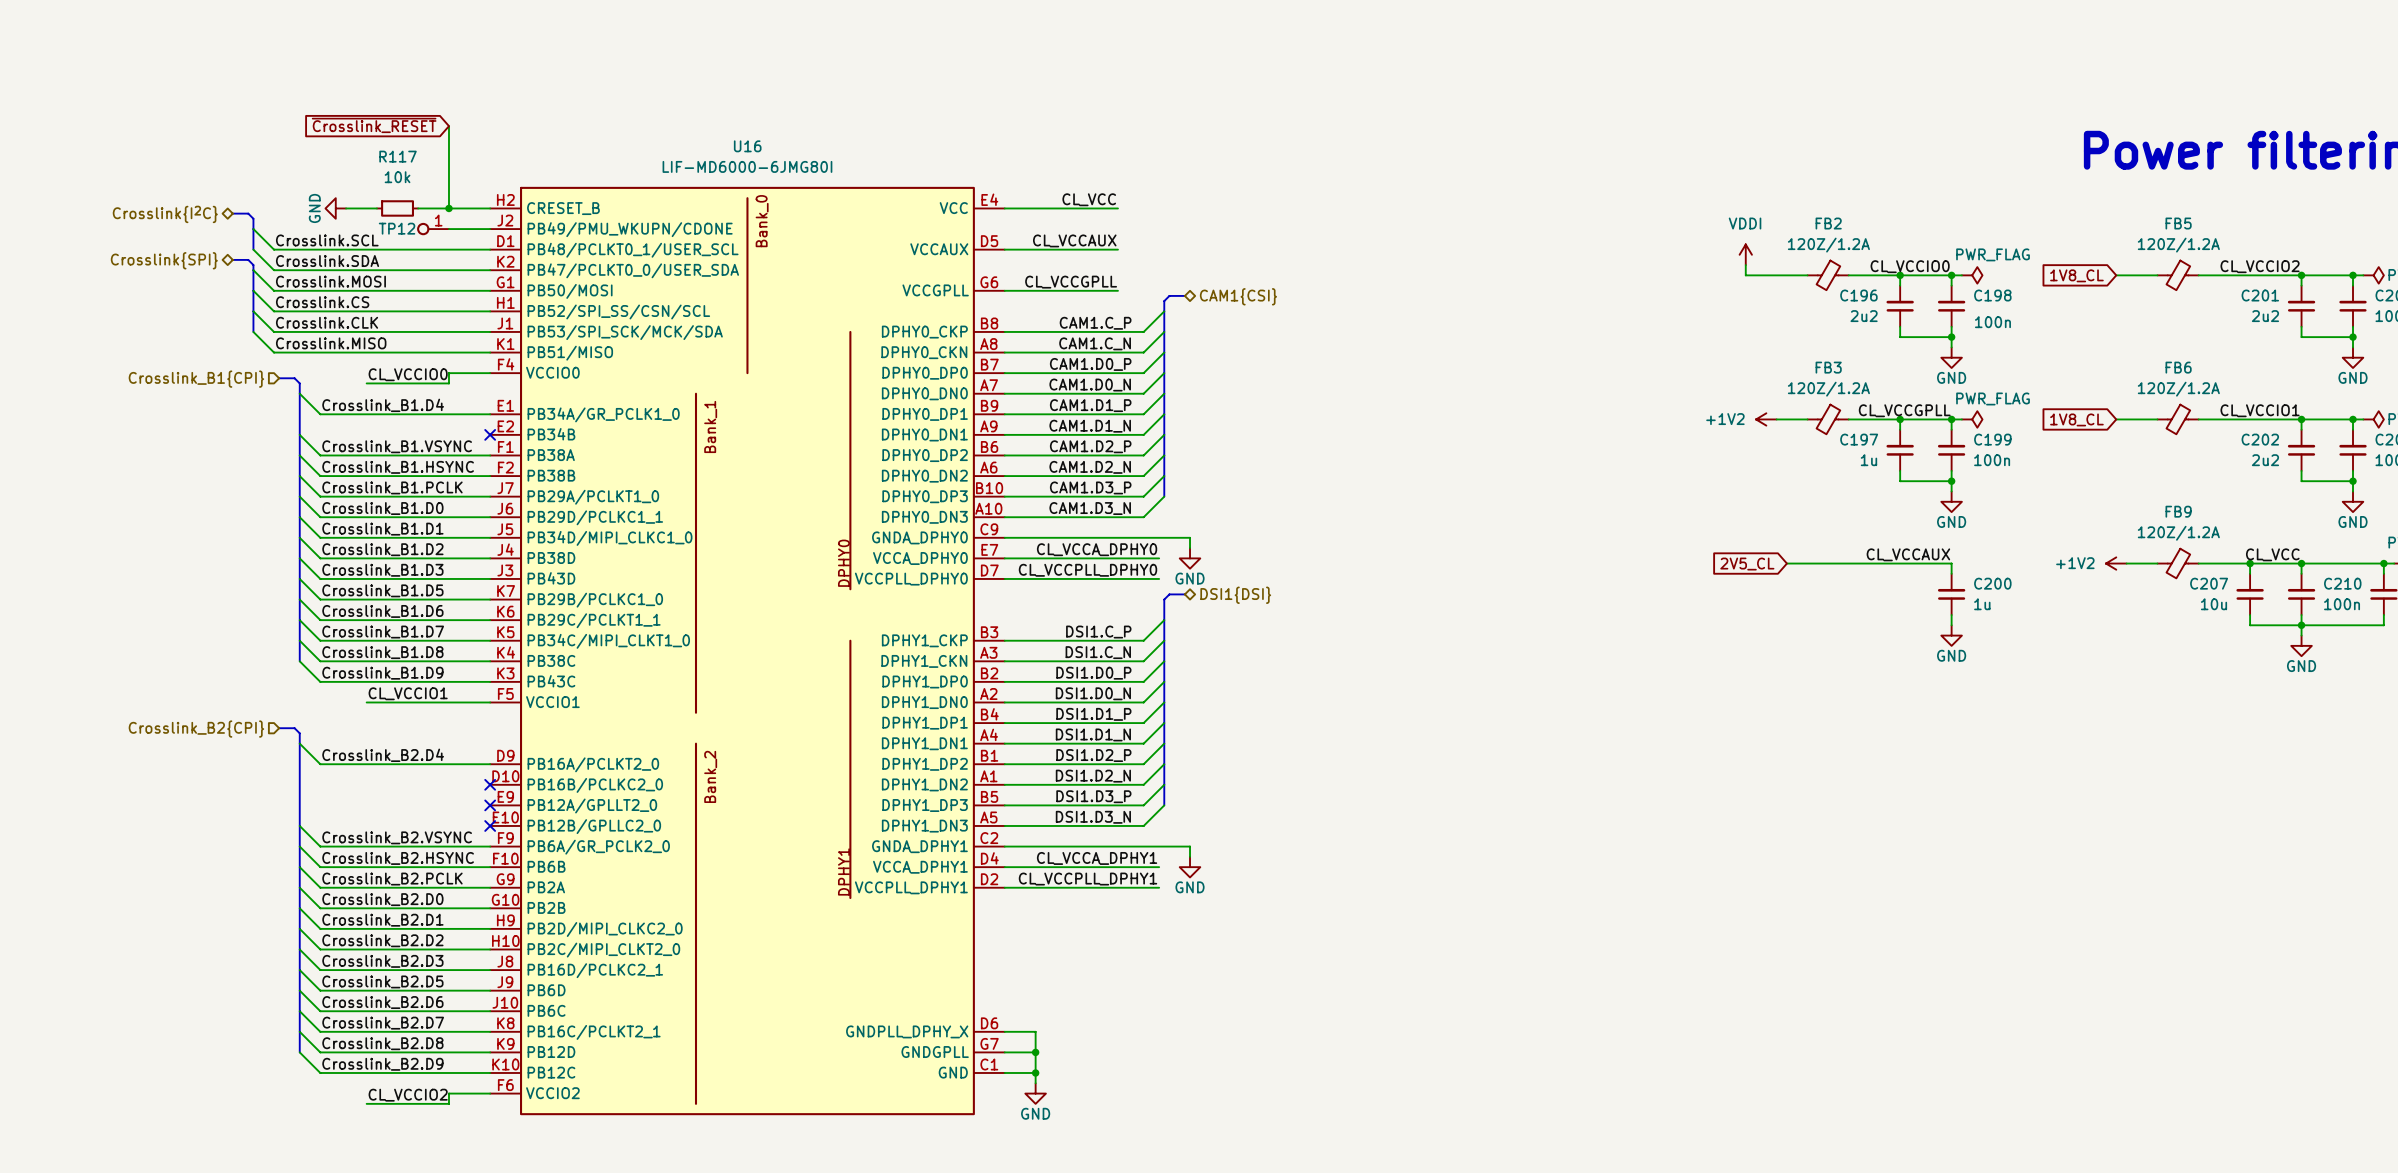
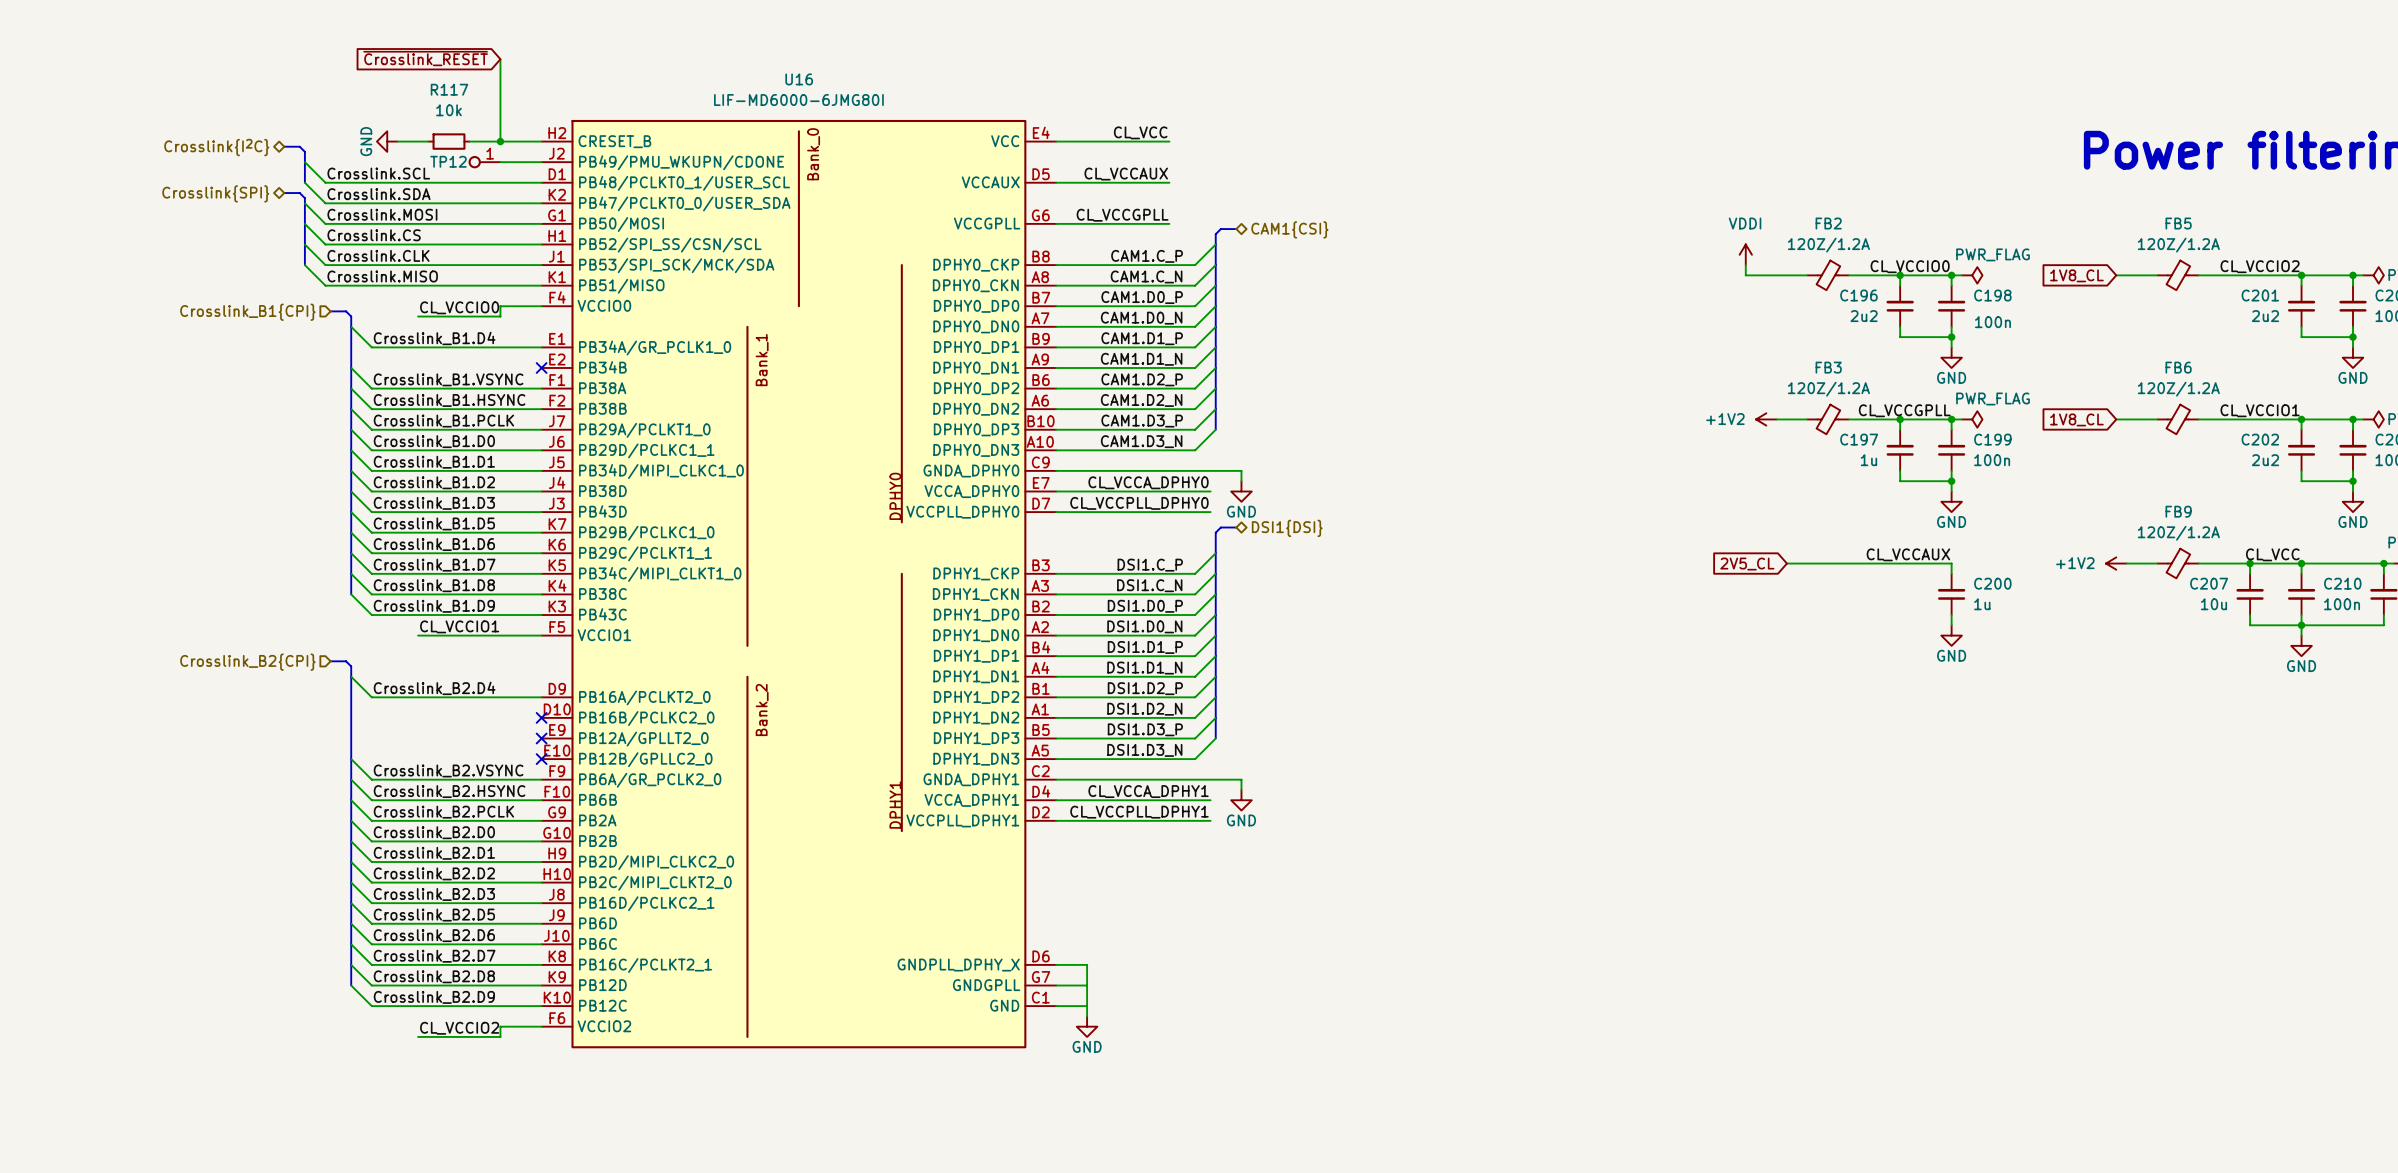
global label position: ~{Crosslink_RESET} (374, 125) -> ~{Crosslink_RESET} (425, 58)
wire: (448, 126) (448, 208) -> (500, 59) (500, 141)
junction: none -> (500, 141)
label position: CL_VCC (1089, 199) -> CL_VCC (1140, 132)
power symbol position: GND (335, 208) -> GND (387, 141)
wire: (346, 208) (376, 208) -> (397, 141) (428, 141)
R117 position: (397, 208) -> (448, 141)
wire: (418, 208) (490, 208) -> (469, 141) (541, 141)
junction: (448, 208) -> none
wire: (1004, 208) (1117, 208) -> (1056, 141) (1169, 141)
bus: (232, 213) (248, 213) (253, 218) (253, 249) -> (284, 146) (299, 146) (304, 151) (304, 182)
hierarchical label position: Crosslink{I2C} (165, 214) -> Crosslink{I2C} (216, 147)
wire: (253, 229) (274, 249) (490, 249) -> (304, 162) (325, 182) (541, 182)
TP12 position: (433, 229) -> (484, 162)
wire: (448, 229) (490, 229) -> (500, 162) (541, 162)
label position: Crosslink.SCL (327, 240) -> Crosslink.SCL (378, 173)
label position: CL_VCCAUX (1074, 240) -> CL_VCCAUX (1126, 174)
wire: (253, 249) (274, 270) (490, 270) -> (304, 182) (325, 203) (541, 203)
wire: (1004, 249) (1117, 249) -> (1056, 182) (1169, 182)
bus: (232, 259) (248, 259) (253, 265) (253, 331) -> (284, 193) (299, 193) (304, 198) (304, 265)
hierarchical label position: Crosslink{SPI} (164, 260) -> Crosslink{SPI} (215, 193)
label position: Crosslink.SDA (327, 261) -> Crosslink.SDA (378, 194)
wire: none -> (1215, 265) (1195, 285) (1056, 285)
wire: (253, 270) (274, 290) (490, 290) -> (304, 203) (325, 223) (541, 223)
label position: Crosslink.MOSI (330, 281) -> Crosslink.MOSI (382, 214)
label position: CL_VCCGPLL (1071, 282) -> CL_VCCGPLL (1122, 215)
wire: (253, 290) (274, 311) (490, 311) -> (304, 223) (325, 244) (541, 244)
wire: (1004, 290) (1117, 290) -> (1056, 223) (1169, 223)
bus: (1184, 295) (1169, 295) (1164, 301) (1164, 496) -> (1236, 229) (1220, 229) (1215, 234) (1215, 429)
hierarchical label position: CAM1{CSI} (1238, 296) -> CAM1{CSI} (1289, 229)
label position: Crosslink.CS (322, 302) -> Crosslink.CS (374, 235)
wire: none -> (1215, 306) (1195, 326) (1056, 326)
wire: (253, 311) (274, 331) (490, 331) -> (304, 244) (325, 265) (541, 265)
bus: none -> (330, 311) (346, 311) (351, 316) (351, 594)
wire: (1164, 311) (1143, 331) (1004, 331) -> (1215, 244) (1195, 265) (1056, 265)
label position: Crosslink.CLK (327, 322) -> Crosslink.CLK (378, 255)
label position: CAM1.C_P (1095, 323) -> CAM1.C_P (1147, 256)
wire: none -> (351, 326) (371, 347) (541, 347)
wire: (253, 331) (274, 352) (490, 352) -> (304, 265) (325, 285) (541, 285)
wire: (1164, 331) (1143, 352) -> none
label position: Crosslink.MISO (331, 343) -> Crosslink.MISO (382, 276)
label position: CAM1.C_N (1095, 343) -> CAM1.C_N (1146, 276)
wire: (1004, 352) (1143, 352) -> none
wire: (1164, 352) (1143, 373) (1004, 373) -> (1215, 285) (1195, 306) (1056, 306)
label position: CAM1.D0_P (1090, 364) -> CAM1.D0_P (1142, 297)
wire: none -> (351, 367) (371, 388) (541, 388)
no-connect mark: none -> (541, 367)
wire: none -> (1215, 367) (1195, 388) (1056, 388)
wire: (490, 373) (448, 373) (448, 383) (366, 383) -> (541, 306) (500, 306) (500, 316) (418, 316)
wire: (1164, 373) (1143, 393) -> none
label position: CL_VCCIO0 (408, 374) -> CL_VCCIO0 (459, 307)
bus: (279, 378) (294, 378) (299, 383) (299, 661) -> none
hierarchical label position: Crosslink_B1{CPI} (196, 379) -> Crosslink_B1{CPI} (247, 312)
label position: CAM1.D0_N (1090, 385) -> CAM1.D0_N (1141, 318)
wire: none -> (351, 388) (371, 409) (541, 409)
wire: (299, 393) (320, 414) -> none
wire: (1004, 393) (1143, 393) -> none
wire: (1164, 393) (1143, 414) (1004, 414) -> (1215, 326) (1195, 347) (1056, 347)
label position: Crosslink_B1.D4 (383, 405) -> Crosslink_B1.D4 (434, 338)
label position: CAM1.D1_P (1090, 405) -> CAM1.D1_P (1142, 338)
wire: none -> (351, 409) (371, 429) (541, 429)
wire: none -> (1215, 409) (1195, 429) (1056, 429)
wire: (320, 414) (490, 414) -> none
wire: (1164, 414) (1143, 434) (1004, 434) -> (1215, 347) (1195, 367) (1056, 367)
label position: CAM1.D1_N (1090, 426) -> CAM1.D1_N (1141, 359)
wire: none -> (351, 429) (371, 450) (541, 450)
wire: (299, 434) (320, 455) -> none
no-connect mark: (490, 434) -> none
wire: (1164, 434) (1143, 455) -> none
label position: Crosslink_B1.VSYNC (397, 446) -> Crosslink_B1.VSYNC (448, 379)
label position: CAM1.D2_P (1090, 446) -> CAM1.D2_P (1142, 379)
wire: none -> (351, 450) (371, 470) (541, 470)
wire: (299, 455) (320, 476) -> none
wire: (320, 455) (490, 455) -> none
wire: (1004, 455) (1143, 455) -> none
wire: (1164, 455) (1143, 476) (1004, 476) -> (1215, 388) (1195, 409) (1056, 409)
label position: Crosslink_B1.HSYNC (398, 467) -> Crosslink_B1.HSYNC (449, 400)
label position: CAM1.D2_N (1090, 467) -> CAM1.D2_N (1141, 400)
wire: none -> (351, 470) (371, 491) (541, 491)
wire: (299, 476) (320, 496) -> none
wire: (320, 476) (490, 476) -> none
wire: (1164, 476) (1143, 496) -> none
label position: Crosslink_B1.PCLK (392, 487) -> Crosslink_B1.PCLK (443, 421)
label position: CAM1.D3_P (1090, 487) -> CAM1.D3_P (1142, 421)
wire: none -> (351, 491) (371, 512) (541, 512)
wire: (299, 496) (320, 517) -> none
wire: (320, 496) (490, 496) -> none
wire: (1004, 496) (1143, 496) -> none
wire: (1164, 496) (1143, 517) (1004, 517) -> (1215, 429) (1195, 450) (1056, 450)
label position: Crosslink_B1.D0 (382, 508) -> Crosslink_B1.D0 (434, 441)
label position: CAM1.D3_N (1090, 508) -> CAM1.D3_N (1141, 441)
wire: none -> (351, 512) (371, 532) (541, 532)
wire: (299, 517) (320, 537) -> none
wire: (320, 517) (490, 517) -> none
label position: Crosslink_B1.D1 (382, 529) -> Crosslink_B1.D1 (434, 462)
wire: none -> (351, 532) (371, 553) (541, 553)
wire: (299, 537) (320, 558) -> none
wire: (320, 537) (490, 537) -> none
wire: (1004, 537) (1190, 537) (1190, 548) -> (1056, 470) (1241, 470) (1241, 481)
label position: Crosslink_B1.D2 (382, 549) -> Crosslink_B1.D2 (434, 482)
label position: CL_VCCA_DPHY0 (1097, 549) -> CL_VCCA_DPHY0 (1148, 482)
wire: none -> (351, 553) (371, 573) (541, 573)
wire: (299, 558) (320, 578) -> none
wire: (320, 558) (490, 558) -> none
wire: (1004, 558) (1159, 558) -> (1056, 491) (1210, 491)
power symbol position: GND (1190, 558) -> GND (1241, 491)
label position: Crosslink_B1.D3 (382, 570) -> Crosslink_B1.D3 (434, 503)
label position: CL_VCCPLL_DPHY0 (1087, 570) -> CL_VCCPLL_DPHY0 (1139, 503)
wire: none -> (351, 573) (371, 594) (541, 594)
wire: (299, 578) (320, 599) -> none
wire: (320, 578) (490, 578) -> none
wire: (1004, 578) (1159, 578) -> (1056, 512) (1210, 512)
label position: Crosslink_B1.D5 (382, 590) -> Crosslink_B1.D5 (434, 523)
wire: none -> (351, 594) (371, 615) (541, 615)
bus: (1184, 594) (1169, 594) (1164, 599) (1164, 805) -> (1236, 527) (1220, 527) (1215, 532) (1215, 738)
wire: none -> (1215, 594) (1195, 615) (1056, 615)
hierarchical label position: DSI1{DSI} (1235, 595) -> DSI1{DSI} (1287, 528)
wire: (299, 599) (320, 620) -> none
wire: (320, 599) (490, 599) -> none
label position: Crosslink_B1.D6 (382, 611) -> Crosslink_B1.D6 (434, 544)
wire: (299, 620) (320, 640) -> none
wire: (320, 620) (490, 620) -> none
wire: (1164, 620) (1143, 640) (1004, 640) -> (1215, 553) (1195, 573) (1056, 573)
label position: Crosslink_B1.D7 (383, 632) -> Crosslink_B1.D7 (434, 565)
label position: DSI1.C_P (1098, 632) -> DSI1.C_P (1150, 565)
wire: (299, 640) (320, 661) -> none
wire: (320, 640) (490, 640) -> none
wire: (1164, 640) (1143, 661) (1004, 661) -> (1215, 573) (1195, 594) (1056, 594)
U16 position: (747, 651) -> (798, 584)
label position: Crosslink_B1.D8 (382, 652) -> Crosslink_B1.D8 (434, 585)
label position: DSI1.C_N (1098, 652) -> DSI1.C_N (1149, 585)
wire: (299, 661) (320, 681) -> none
wire: (320, 661) (490, 661) -> none
wire: (1164, 661) (1143, 681) -> none
label position: Crosslink_B1.D9 (382, 673) -> Crosslink_B1.D9 (434, 606)
label position: DSI1.D0_P (1093, 673) -> DSI1.D0_P (1145, 606)
wire: none -> (351, 676) (371, 697) (541, 697)
wire: none -> (1215, 676) (1195, 697) (1056, 697)
wire: (320, 681) (490, 681) -> none
wire: (1004, 681) (1143, 681) -> none
wire: (1164, 681) (1143, 702) (1004, 702) -> (1215, 615) (1195, 635) (1056, 635)
label position: CL_VCCIO1 (408, 693) -> CL_VCCIO1 (459, 626)
label position: DSI1.D0_N (1093, 693) -> DSI1.D0_N (1144, 626)
wire: (366, 702) (490, 702) -> (418, 635) (541, 635)
wire: (1164, 702) (1143, 723) (1004, 723) -> (1215, 635) (1195, 656) (1056, 656)
label position: DSI1.D1_P (1093, 714) -> DSI1.D1_P (1145, 647)
no-connect mark: none -> (541, 717)
wire: (1164, 723) (1143, 743) (1004, 743) -> (1215, 656) (1195, 676) (1056, 676)
bus: (279, 728) (294, 728) (299, 733) (299, 1052) -> (330, 661) (346, 661) (351, 666) (351, 985)
hierarchical label position: Crosslink_B2{CPI} (196, 729) -> Crosslink_B2{CPI} (247, 662)
label position: DSI1.D1_N (1093, 734) -> DSI1.D1_N (1144, 668)
no-connect mark: none -> (541, 738)
wire: none -> (1215, 738) (1195, 759) (1056, 759)
wire: (299, 743) (320, 764) -> none
wire: (1164, 743) (1143, 764) -> none
label position: Crosslink_B2.D4 (383, 755) -> Crosslink_B2.D4 (434, 688)
label position: DSI1.D2_P (1093, 755) -> DSI1.D2_P (1145, 688)
wire: none -> (351, 759) (371, 779) (541, 779)
no-connect mark: none -> (541, 759)
wire: (320, 764) (490, 764) -> none
wire: (1004, 764) (1143, 764) -> none
wire: (1164, 764) (1143, 784) (1004, 784) -> (1215, 697) (1195, 717) (1056, 717)
label position: DSI1.D2_N (1093, 776) -> DSI1.D2_N (1144, 709)
wire: none -> (351, 779) (371, 800) (541, 800)
no-connect mark: (490, 784) -> none
wire: (1164, 784) (1143, 805) (1004, 805) -> (1215, 717) (1195, 738) (1056, 738)
label position: DSI1.D3_P (1093, 796) -> DSI1.D3_P (1145, 729)
wire: none -> (351, 800) (371, 820) (541, 820)
no-connect mark: (490, 805) -> none
wire: (1164, 805) (1143, 825) -> none
label position: DSI1.D3_N (1093, 817) -> DSI1.D3_N (1144, 750)
wire: none -> (351, 820) (371, 841) (541, 841)
wire: (299, 825) (320, 846) -> none
no-connect mark: (490, 825) -> none
wire: (1004, 825) (1143, 825) -> none
label position: Crosslink_B2.VSYNC (397, 837) -> Crosslink_B2.VSYNC (448, 770)
wire: none -> (351, 841) (371, 862) (541, 862)
wire: (299, 846) (320, 867) -> none
wire: (320, 846) (490, 846) -> none
wire: (1004, 846) (1190, 846) (1190, 856) -> (1056, 779) (1241, 779) (1241, 789)
label position: Crosslink_B2.HSYNC (398, 858) -> Crosslink_B2.HSYNC (449, 791)
label position: CL_VCCA_DPHY1 (1097, 858) -> CL_VCCA_DPHY1 (1148, 791)
wire: none -> (351, 862) (371, 882) (541, 882)
wire: (299, 867) (320, 887) -> none
wire: (320, 867) (490, 867) -> none
wire: (1004, 867) (1159, 867) -> (1056, 800) (1210, 800)
power symbol position: GND (1190, 867) -> GND (1241, 800)
label position: Crosslink_B2.PCLK (392, 879) -> Crosslink_B2.PCLK (443, 812)
label position: CL_VCCPLL_DPHY1 (1087, 879) -> CL_VCCPLL_DPHY1 (1139, 812)
wire: none -> (351, 882) (371, 903) (541, 903)
wire: (299, 887) (320, 908) -> none
wire: (320, 887) (490, 887) -> none
wire: (1004, 887) (1159, 887) -> (1056, 820) (1210, 820)
label position: Crosslink_B2.D0 (382, 899) -> Crosslink_B2.D0 (434, 832)
wire: none -> (351, 903) (371, 923) (541, 923)
wire: (299, 908) (320, 928) -> none
wire: (320, 908) (490, 908) -> none
label position: Crosslink_B2.D1 (382, 920) -> Crosslink_B2.D1 (434, 853)
wire: none -> (351, 923) (371, 944) (541, 944)
wire: (299, 928) (320, 949) -> none
wire: (320, 928) (490, 928) -> none
label position: Crosslink_B2.D2 (382, 940) -> Crosslink_B2.D2 (434, 873)
wire: none -> (351, 944) (371, 964) (541, 964)
wire: (299, 949) (320, 970) -> none
wire: (320, 949) (490, 949) -> none
label position: Crosslink_B2.D3 (382, 961) -> Crosslink_B2.D3 (434, 894)
wire: none -> (351, 964) (371, 985) (541, 985)
wire: (299, 970) (320, 990) -> none
wire: (320, 970) (490, 970) -> none
label position: Crosslink_B2.D5 (382, 981) -> Crosslink_B2.D5 (434, 915)
wire: none -> (351, 985) (371, 1006) (541, 1006)
wire: (299, 990) (320, 1011) -> none
wire: (320, 990) (490, 990) -> none
label position: Crosslink_B2.D6 (382, 1002) -> Crosslink_B2.D6 (434, 935)
wire: (299, 1011) (320, 1031) -> none
wire: (320, 1011) (490, 1011) -> none
label position: Crosslink_B2.D7 (383, 1023) -> Crosslink_B2.D7 (434, 956)
wire: (299, 1031) (320, 1052) -> none
wire: (320, 1031) (490, 1031) -> none
wire: (1004, 1031) (1035, 1031) (1035, 1083) -> (1056, 964) (1087, 964) (1087, 1016)
label position: Crosslink_B2.D8 (382, 1043) -> Crosslink_B2.D8 (434, 976)
wire: (299, 1052) (320, 1072) -> none
wire: (320, 1052) (490, 1052) -> none
wire: (1004, 1052) (1035, 1052) -> (1056, 985) (1087, 985)
junction: (1035, 1052) -> none
label position: Crosslink_B2.D9 (382, 1064) -> Crosslink_B2.D9 (434, 997)
wire: (320, 1072) (490, 1072) -> none
wire: (1004, 1072) (1035, 1072) -> (1056, 1006) (1087, 1006)
junction: (1035, 1072) -> none
wire: (490, 1093) (448, 1093) (448, 1103) (366, 1103) -> (541, 1026) (500, 1026) (500, 1036) (418, 1036)
power symbol position: GND (1035, 1093) -> GND (1087, 1026)
label position: CL_VCCIO2 (408, 1095) -> CL_VCCIO2 (459, 1028)

